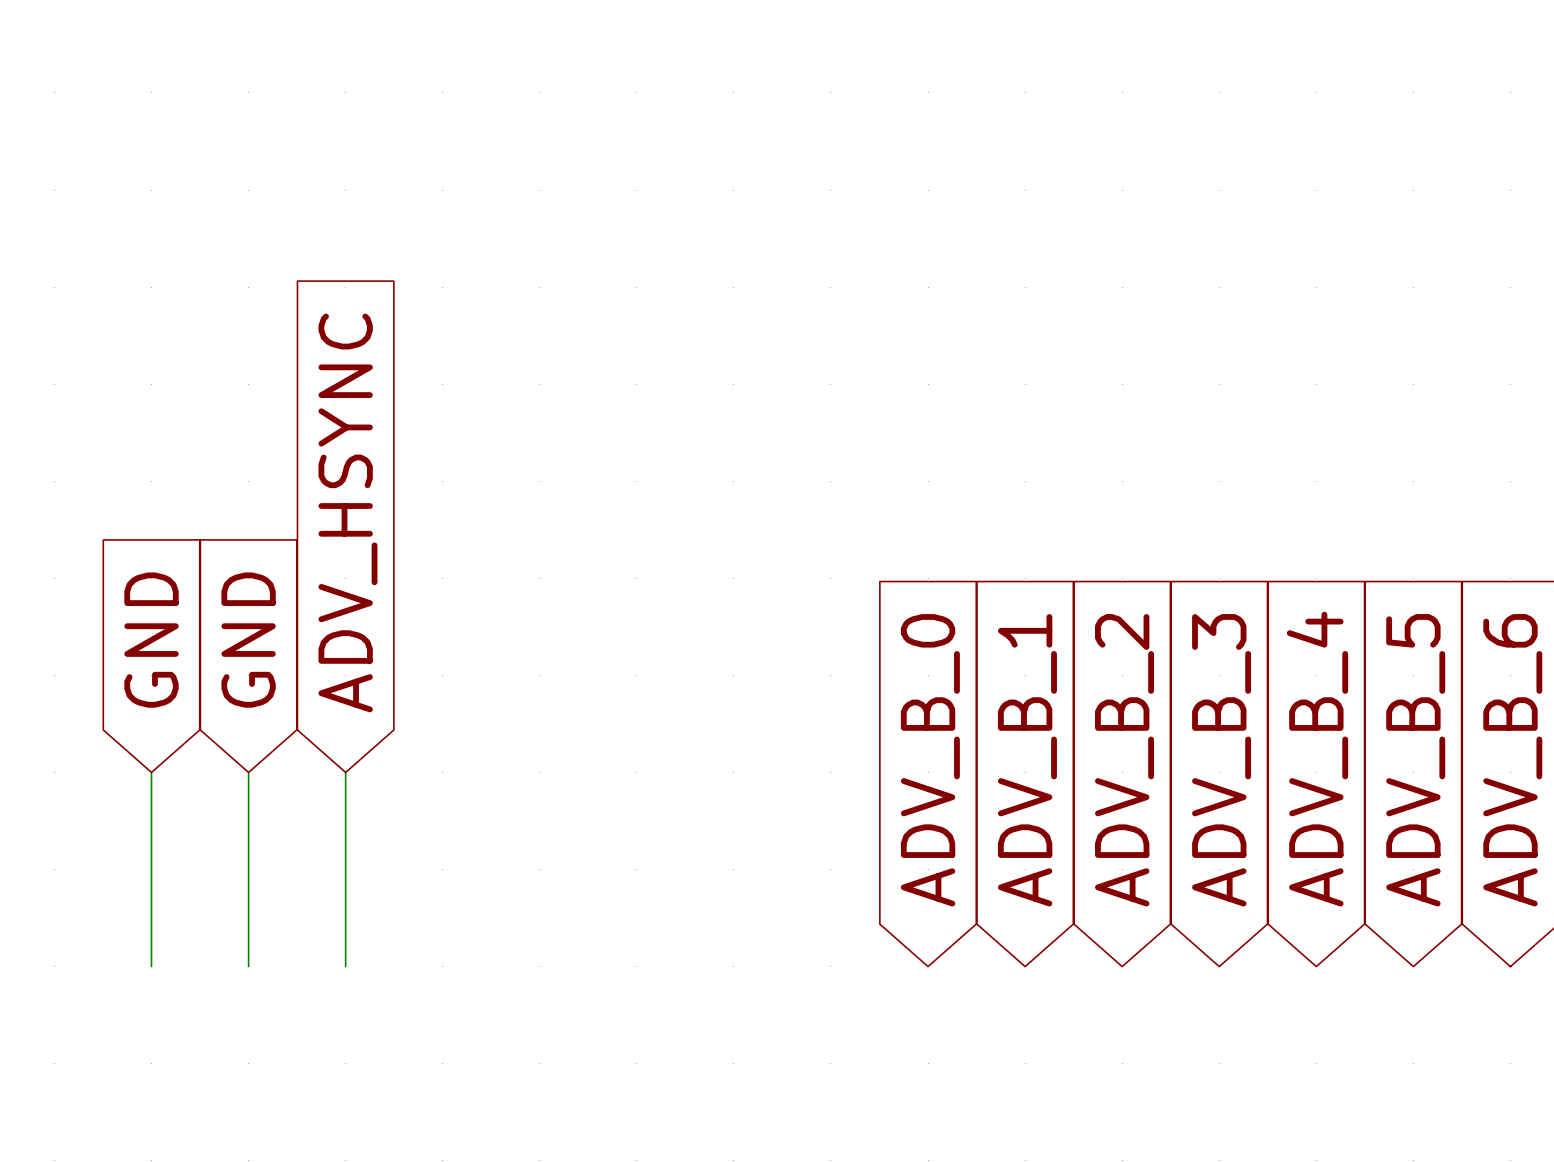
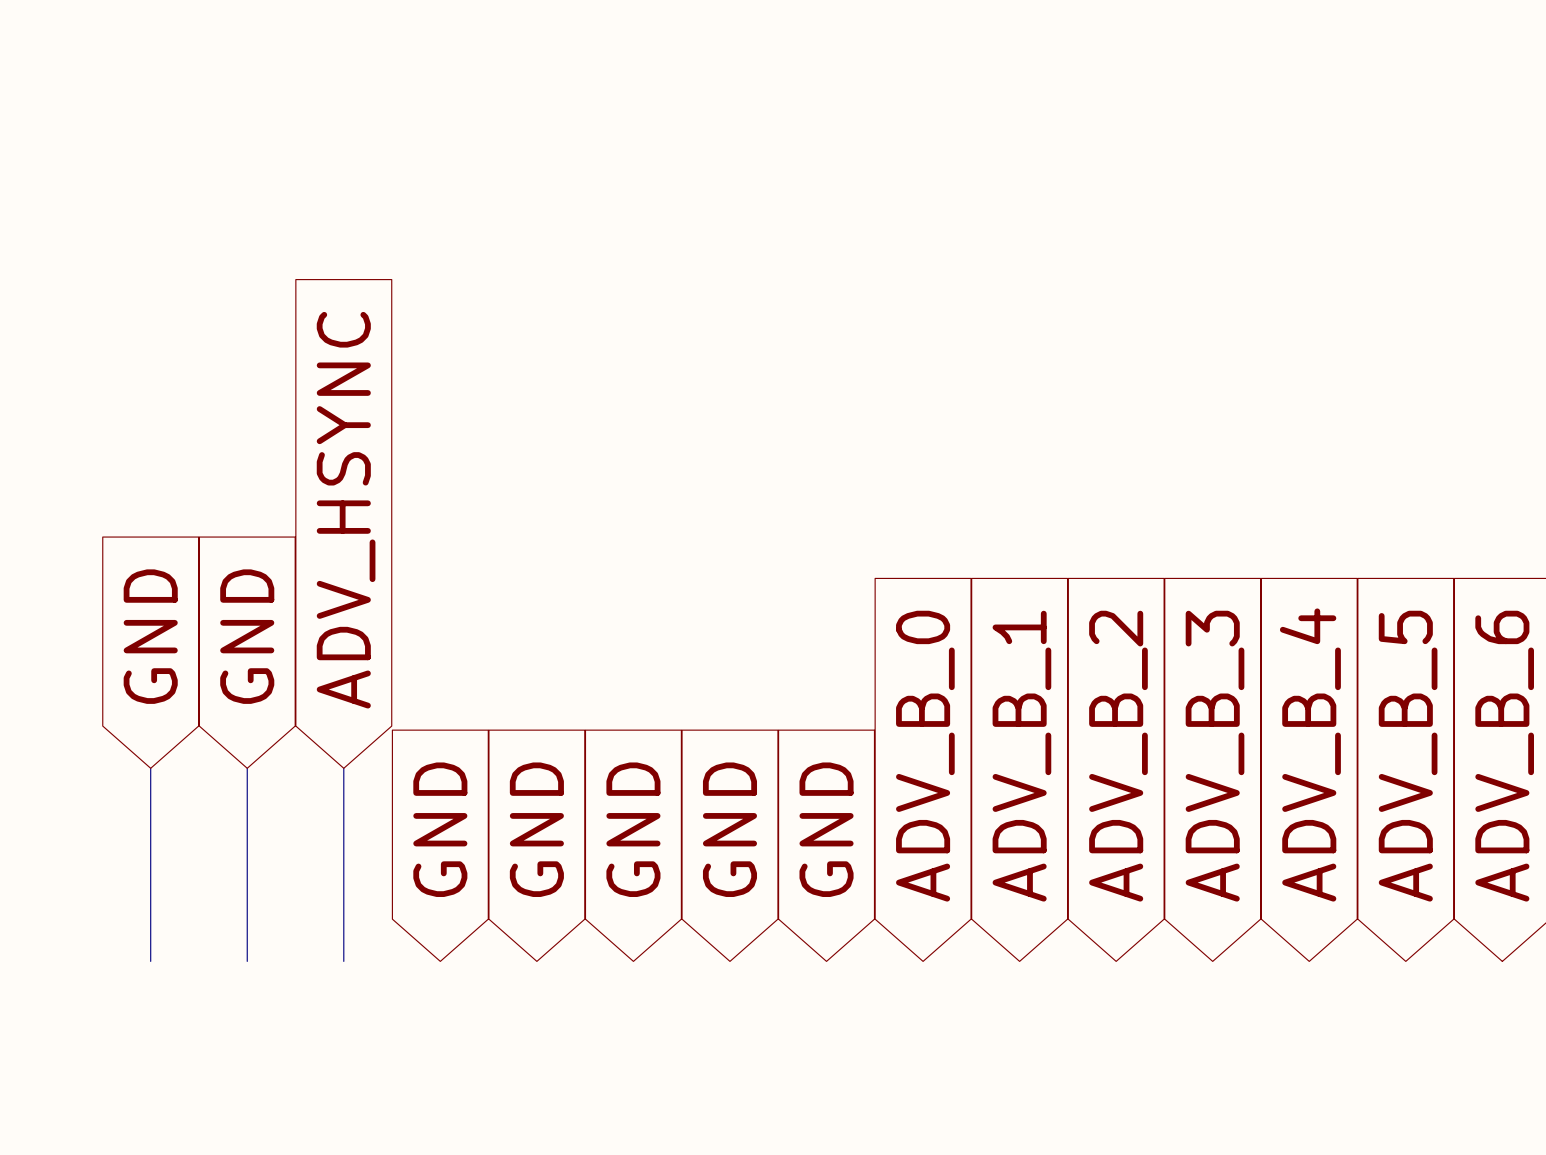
global label: none -> GND (440, 829)
global label: none -> GND (536, 829)
global label: none -> GND (633, 829)
global label: none -> GND (729, 829)
global label: none -> GND (826, 829)

